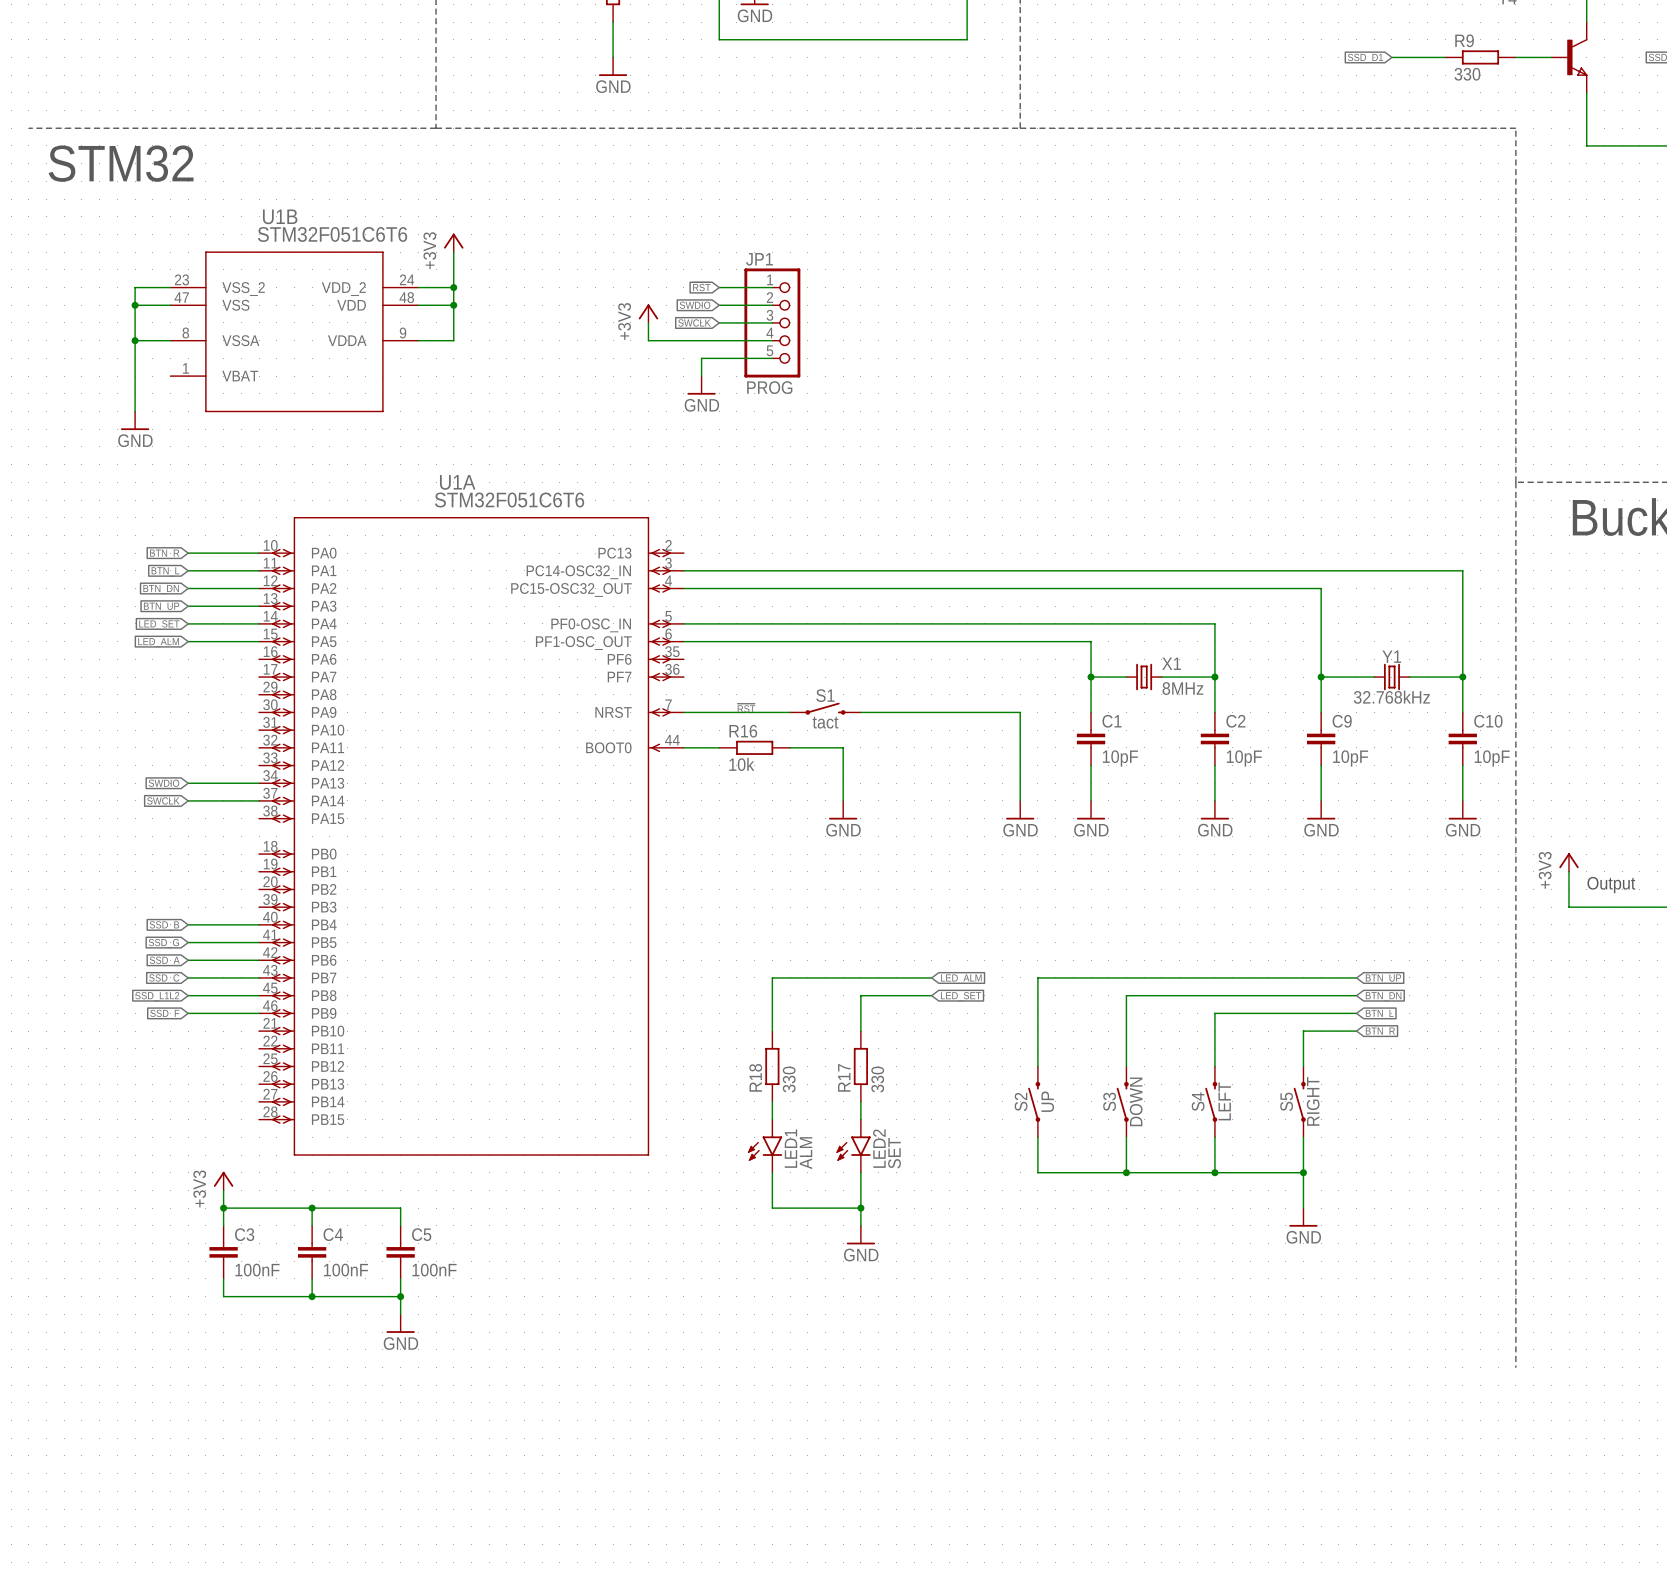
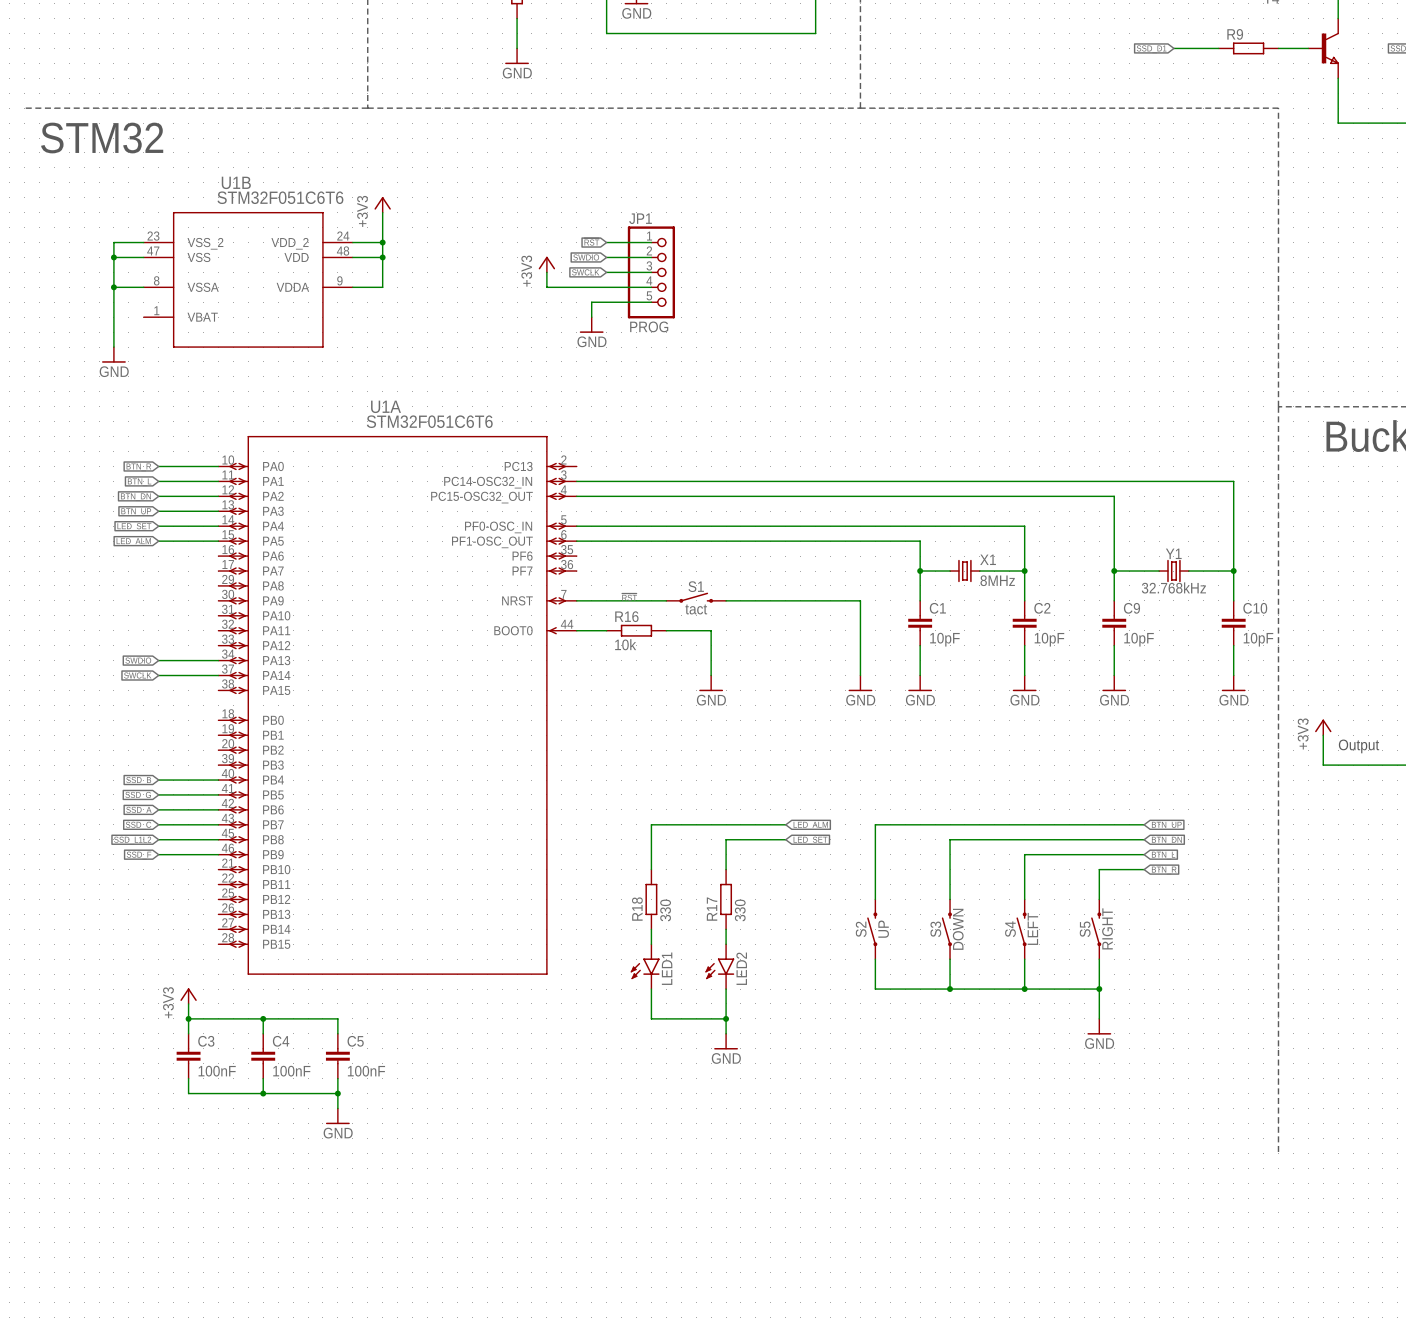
R9 value: 330 (1467, 74) -> none
LED1 value: ALM (806, 1153) -> none
LED2 value: SET (894, 1153) -> none

